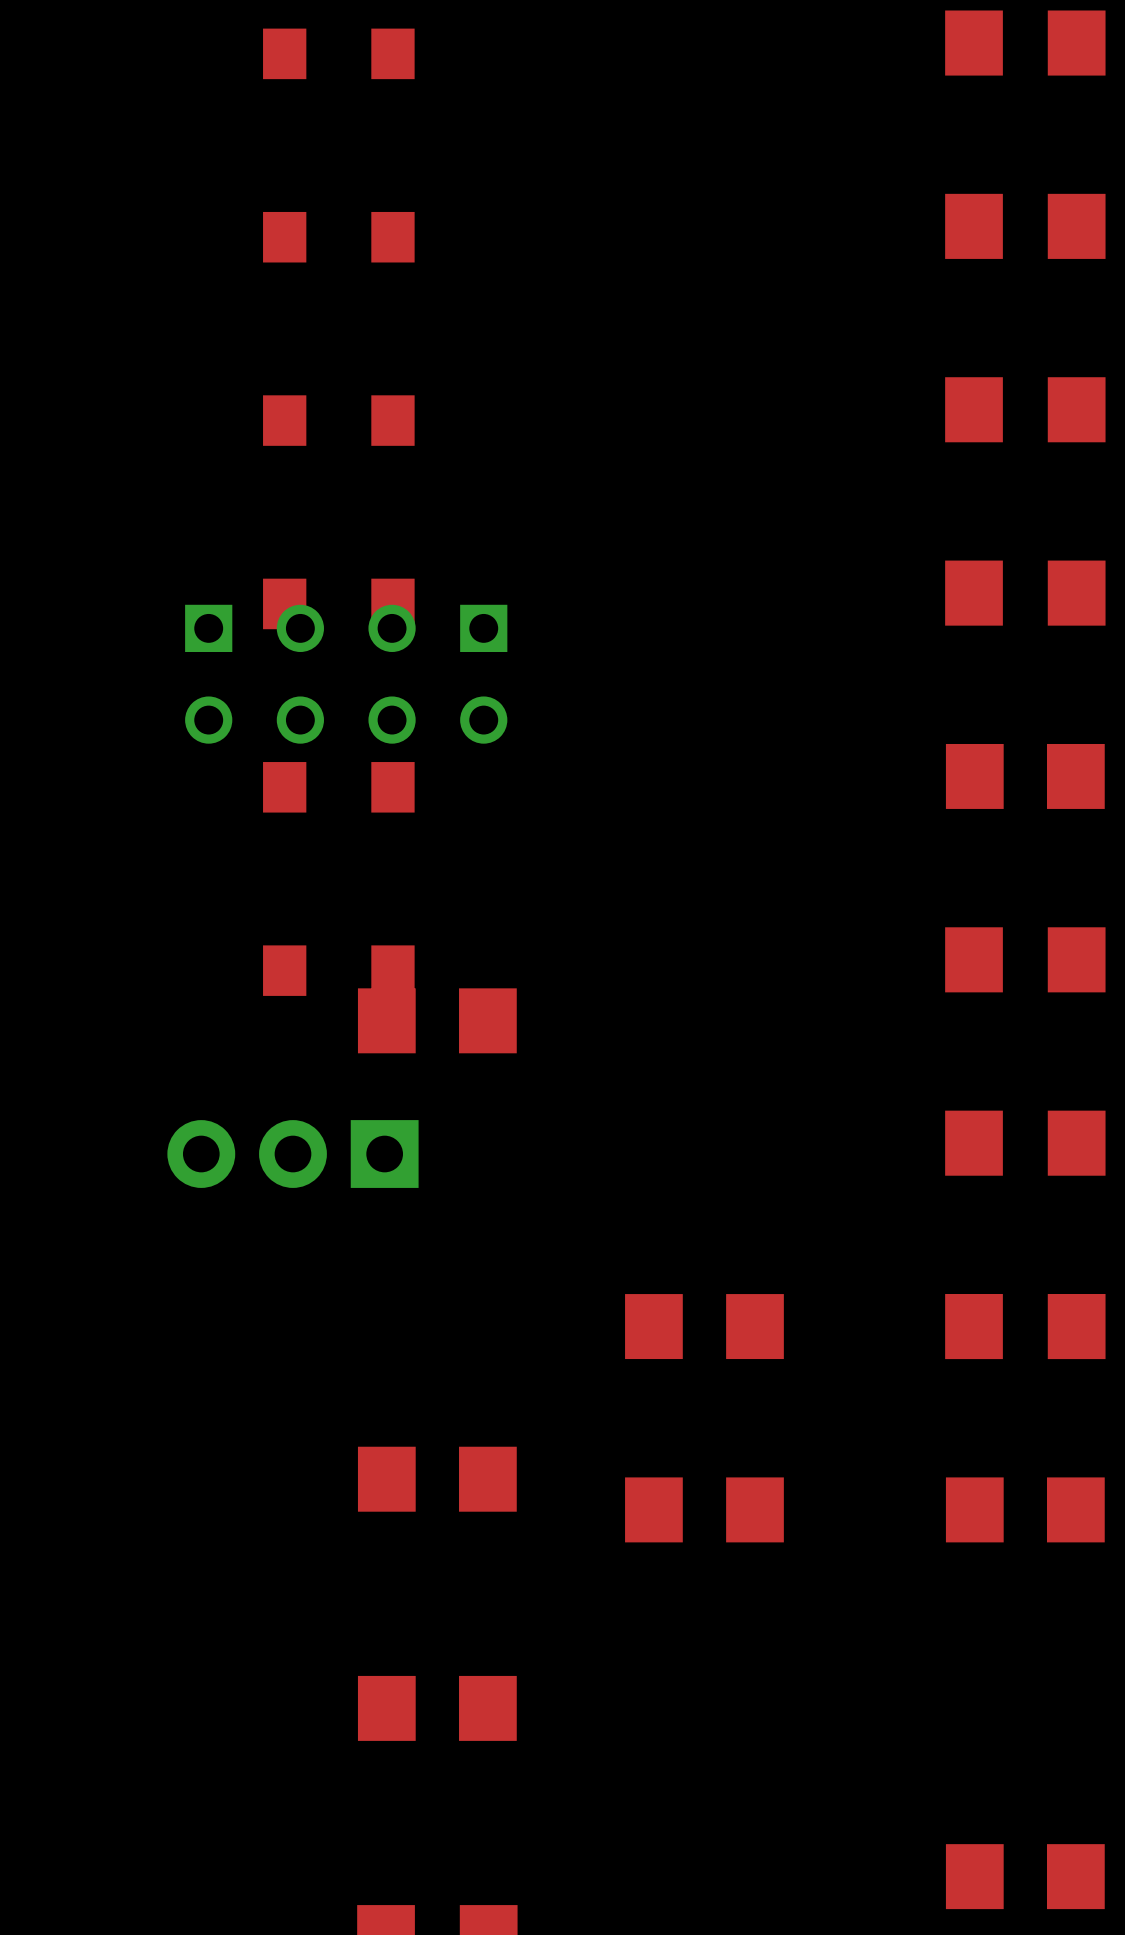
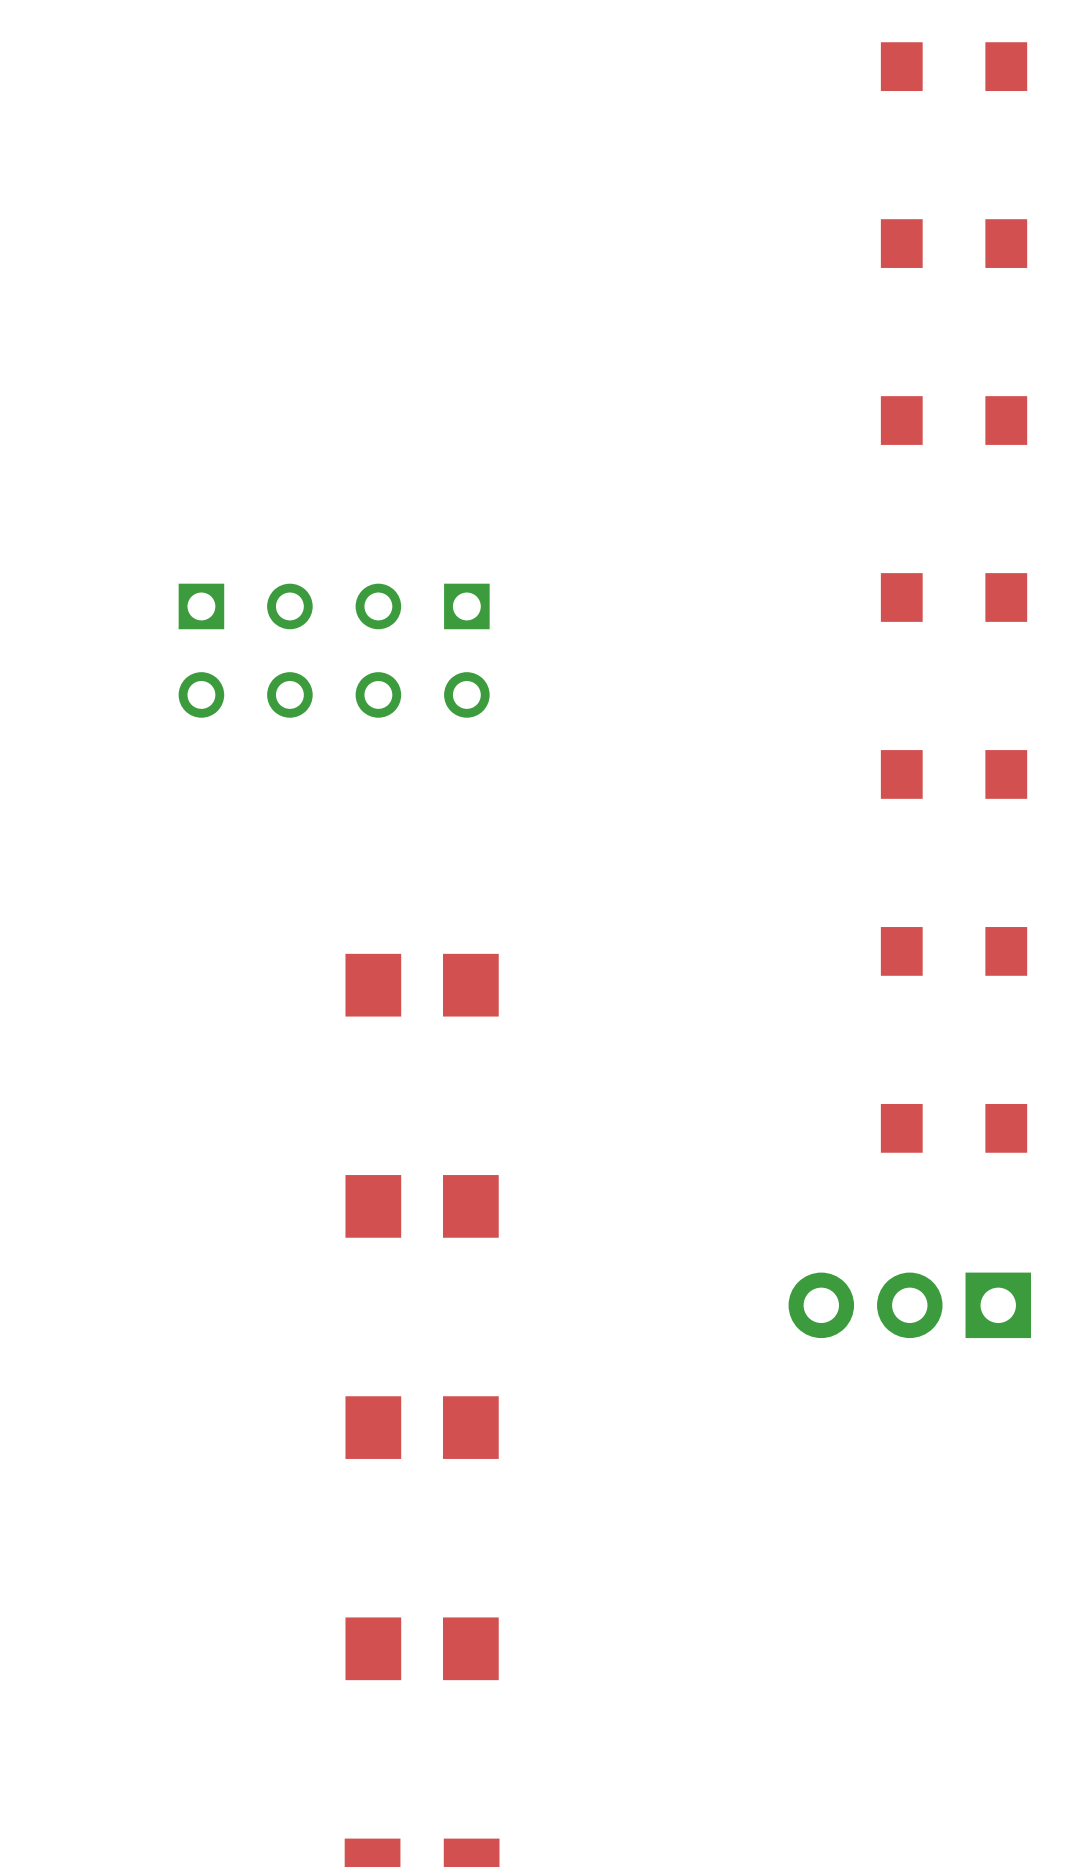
part: (1025, 43) -> none
part: (338, 53) -> none
part: none -> (954, 66)
part: (1025, 226) -> none
part: (338, 237) -> none
part: none -> (954, 243)
part: (1025, 409) -> none
part: (338, 420) -> none
part: none -> (954, 420)
part: (1025, 593) -> none
part: (338, 603) -> none
part: none -> (954, 597)
part: (1025, 776) -> none
part: (338, 787) -> none
part: none -> (954, 774)
part: (1025, 959) -> none
part: (338, 970) -> none
part: none -> (954, 951)
part: (1025, 1143) -> none
part position: (292, 1154) -> (909, 1305)
part: none -> (954, 1128)
part: none -> (422, 1206)
part: (704, 1326) -> none
part: (1025, 1326) -> none
part: (704, 1509) -> none
part: (1025, 1509) -> none
part: (1025, 1876) -> none

